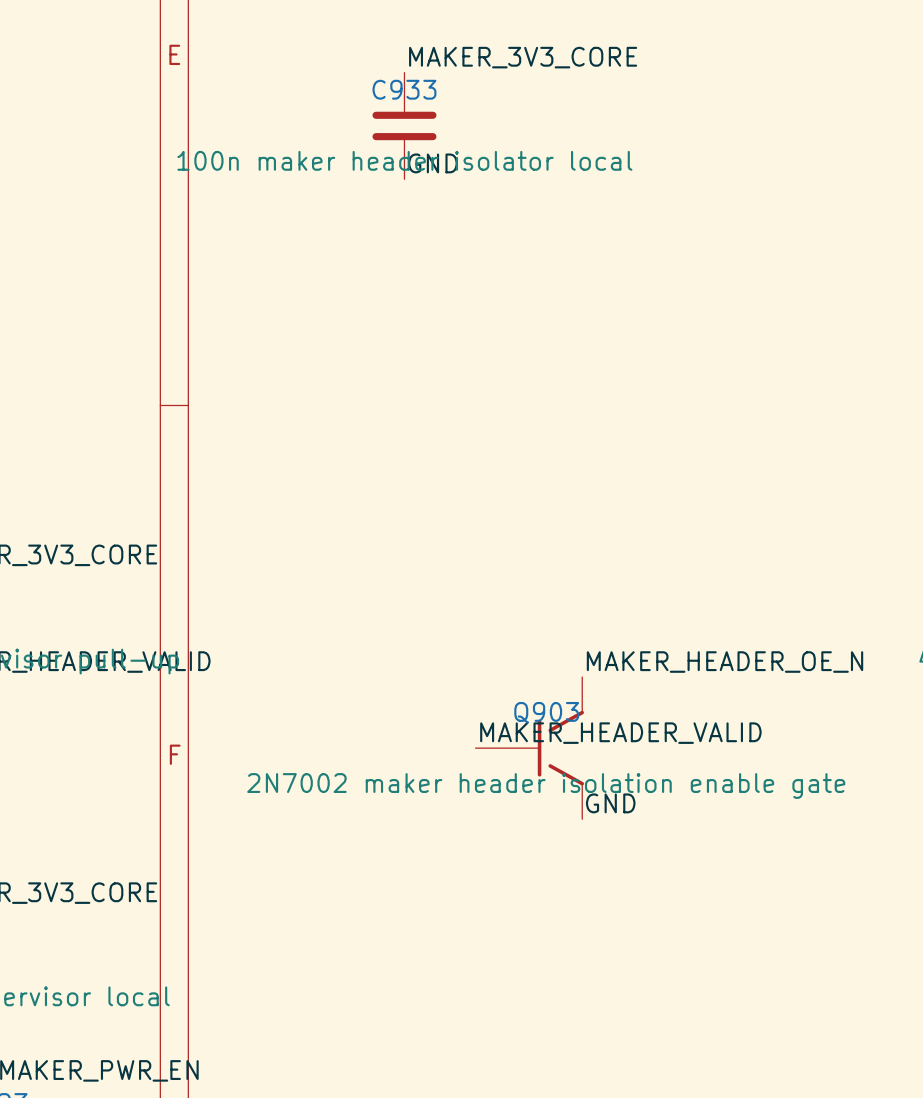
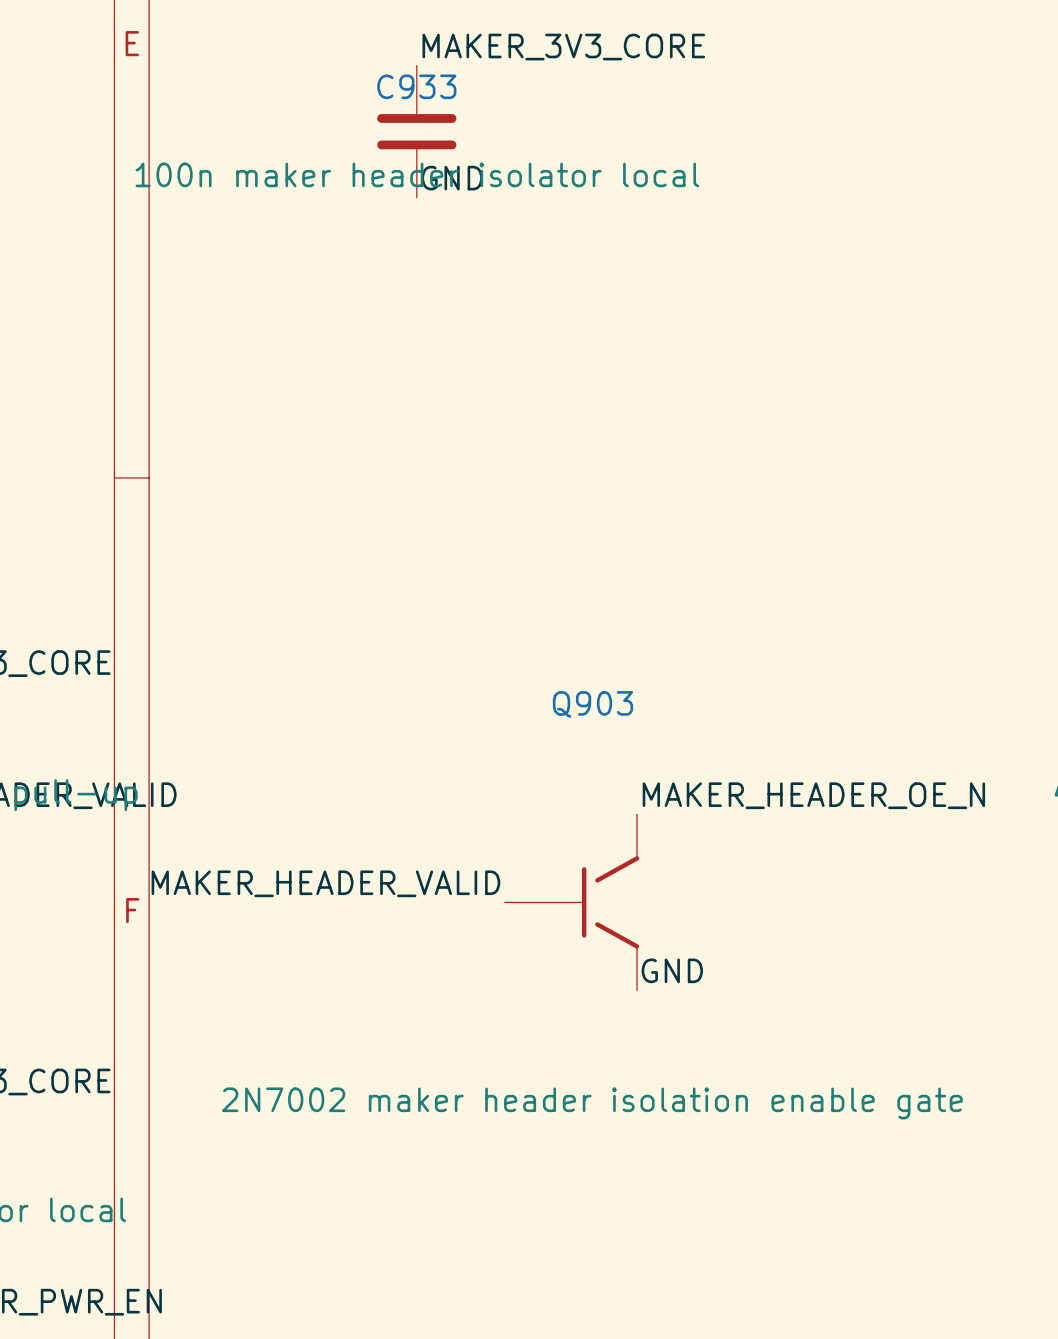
Q903 name position: Q903 (546, 712) -> Q903 (592, 704)
label position: MAKER_HEADER_VALID (620, 733) -> MAKER_HEADER_VALID (325, 883)
Q903 value position: 2N7002 maker header isolation enable gate (546, 785) -> 2N7002 maker header isolation enable gate (592, 1103)

